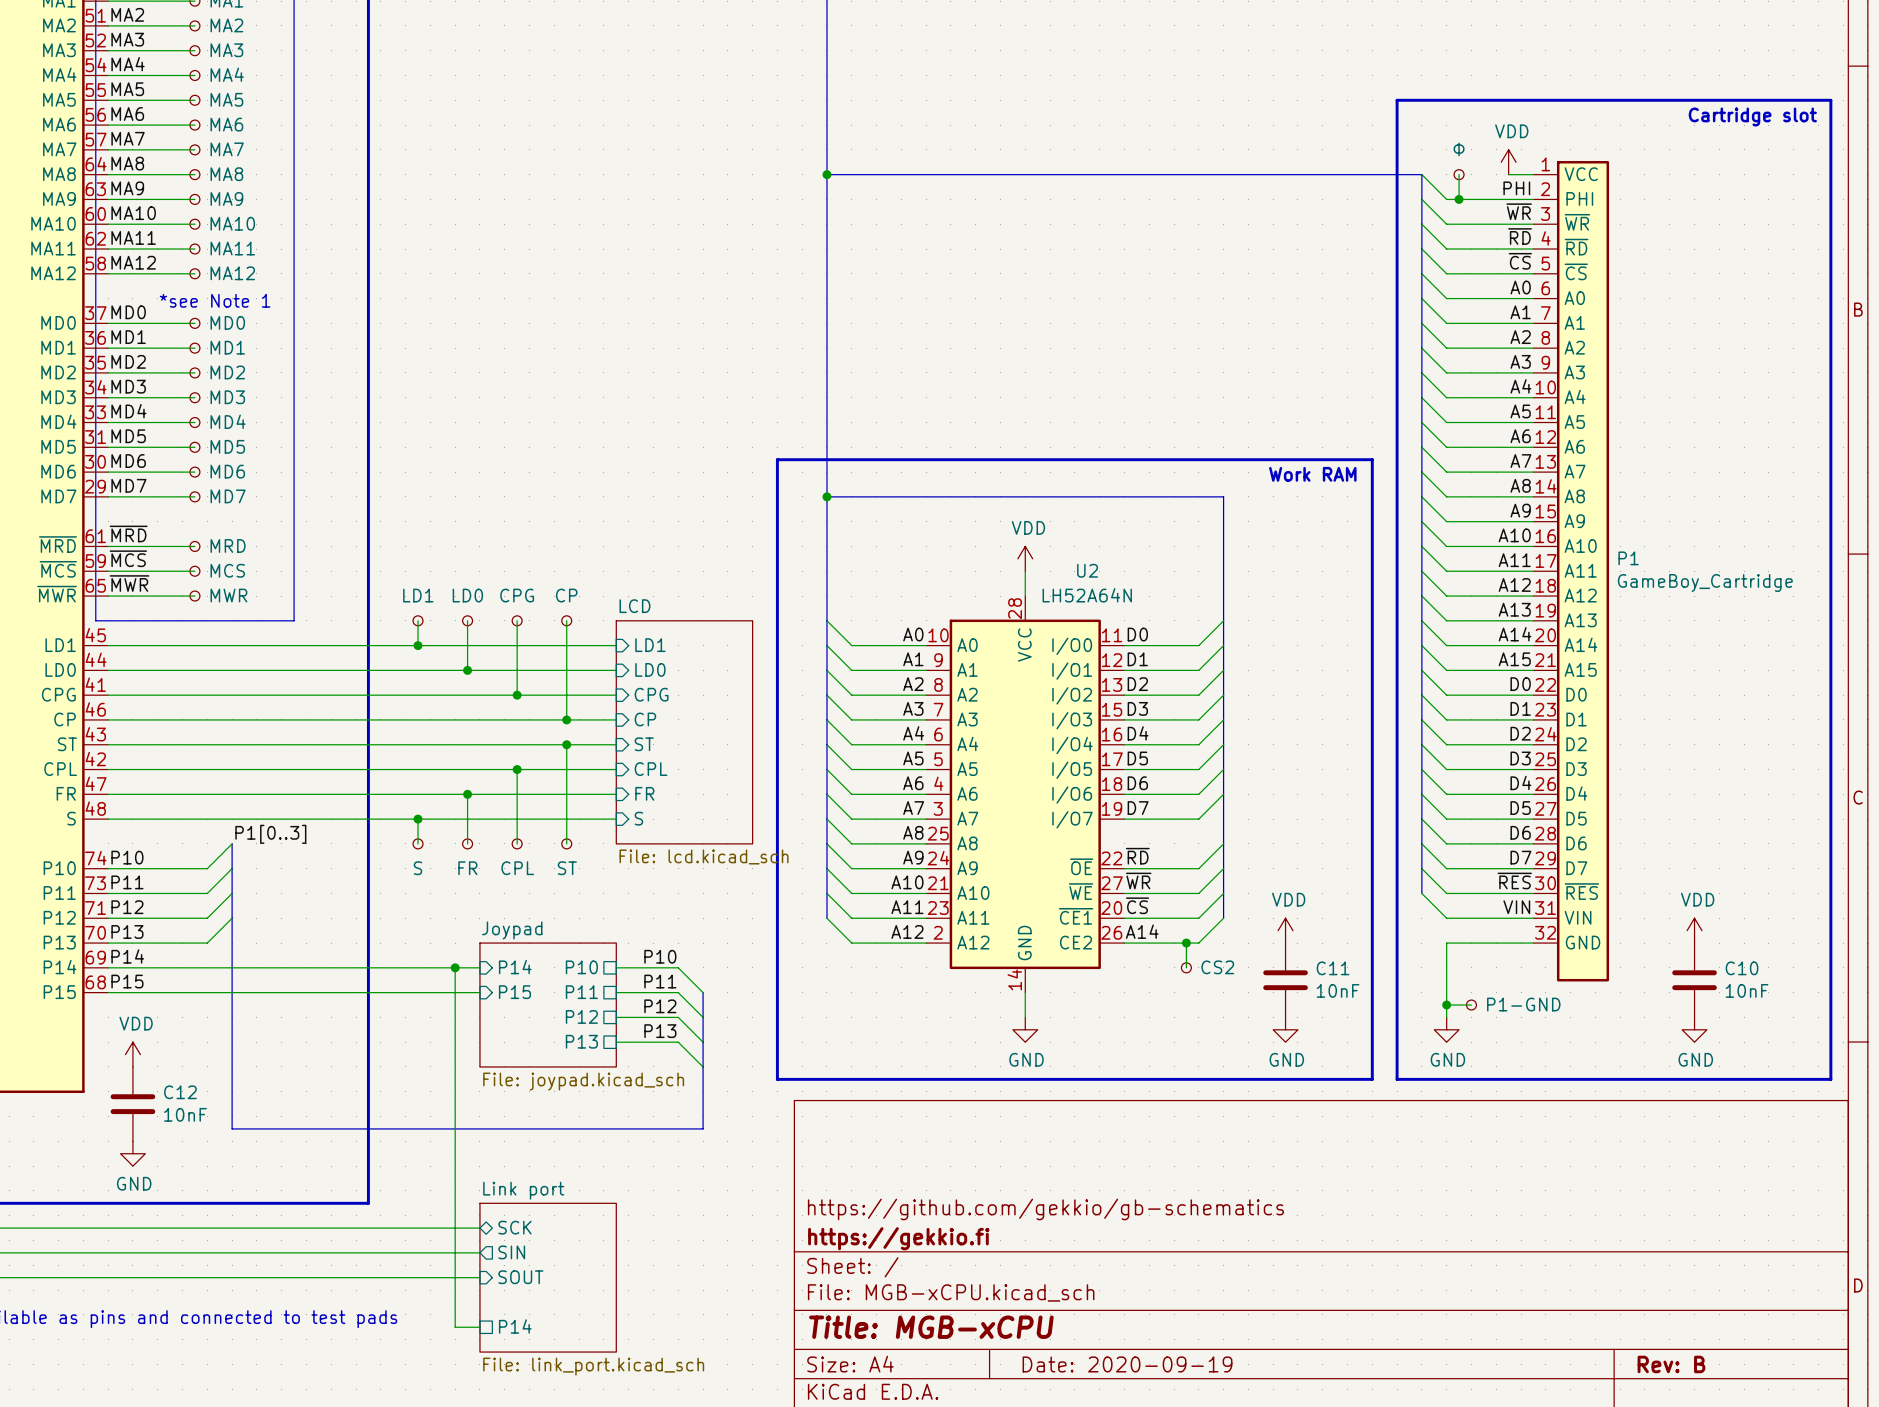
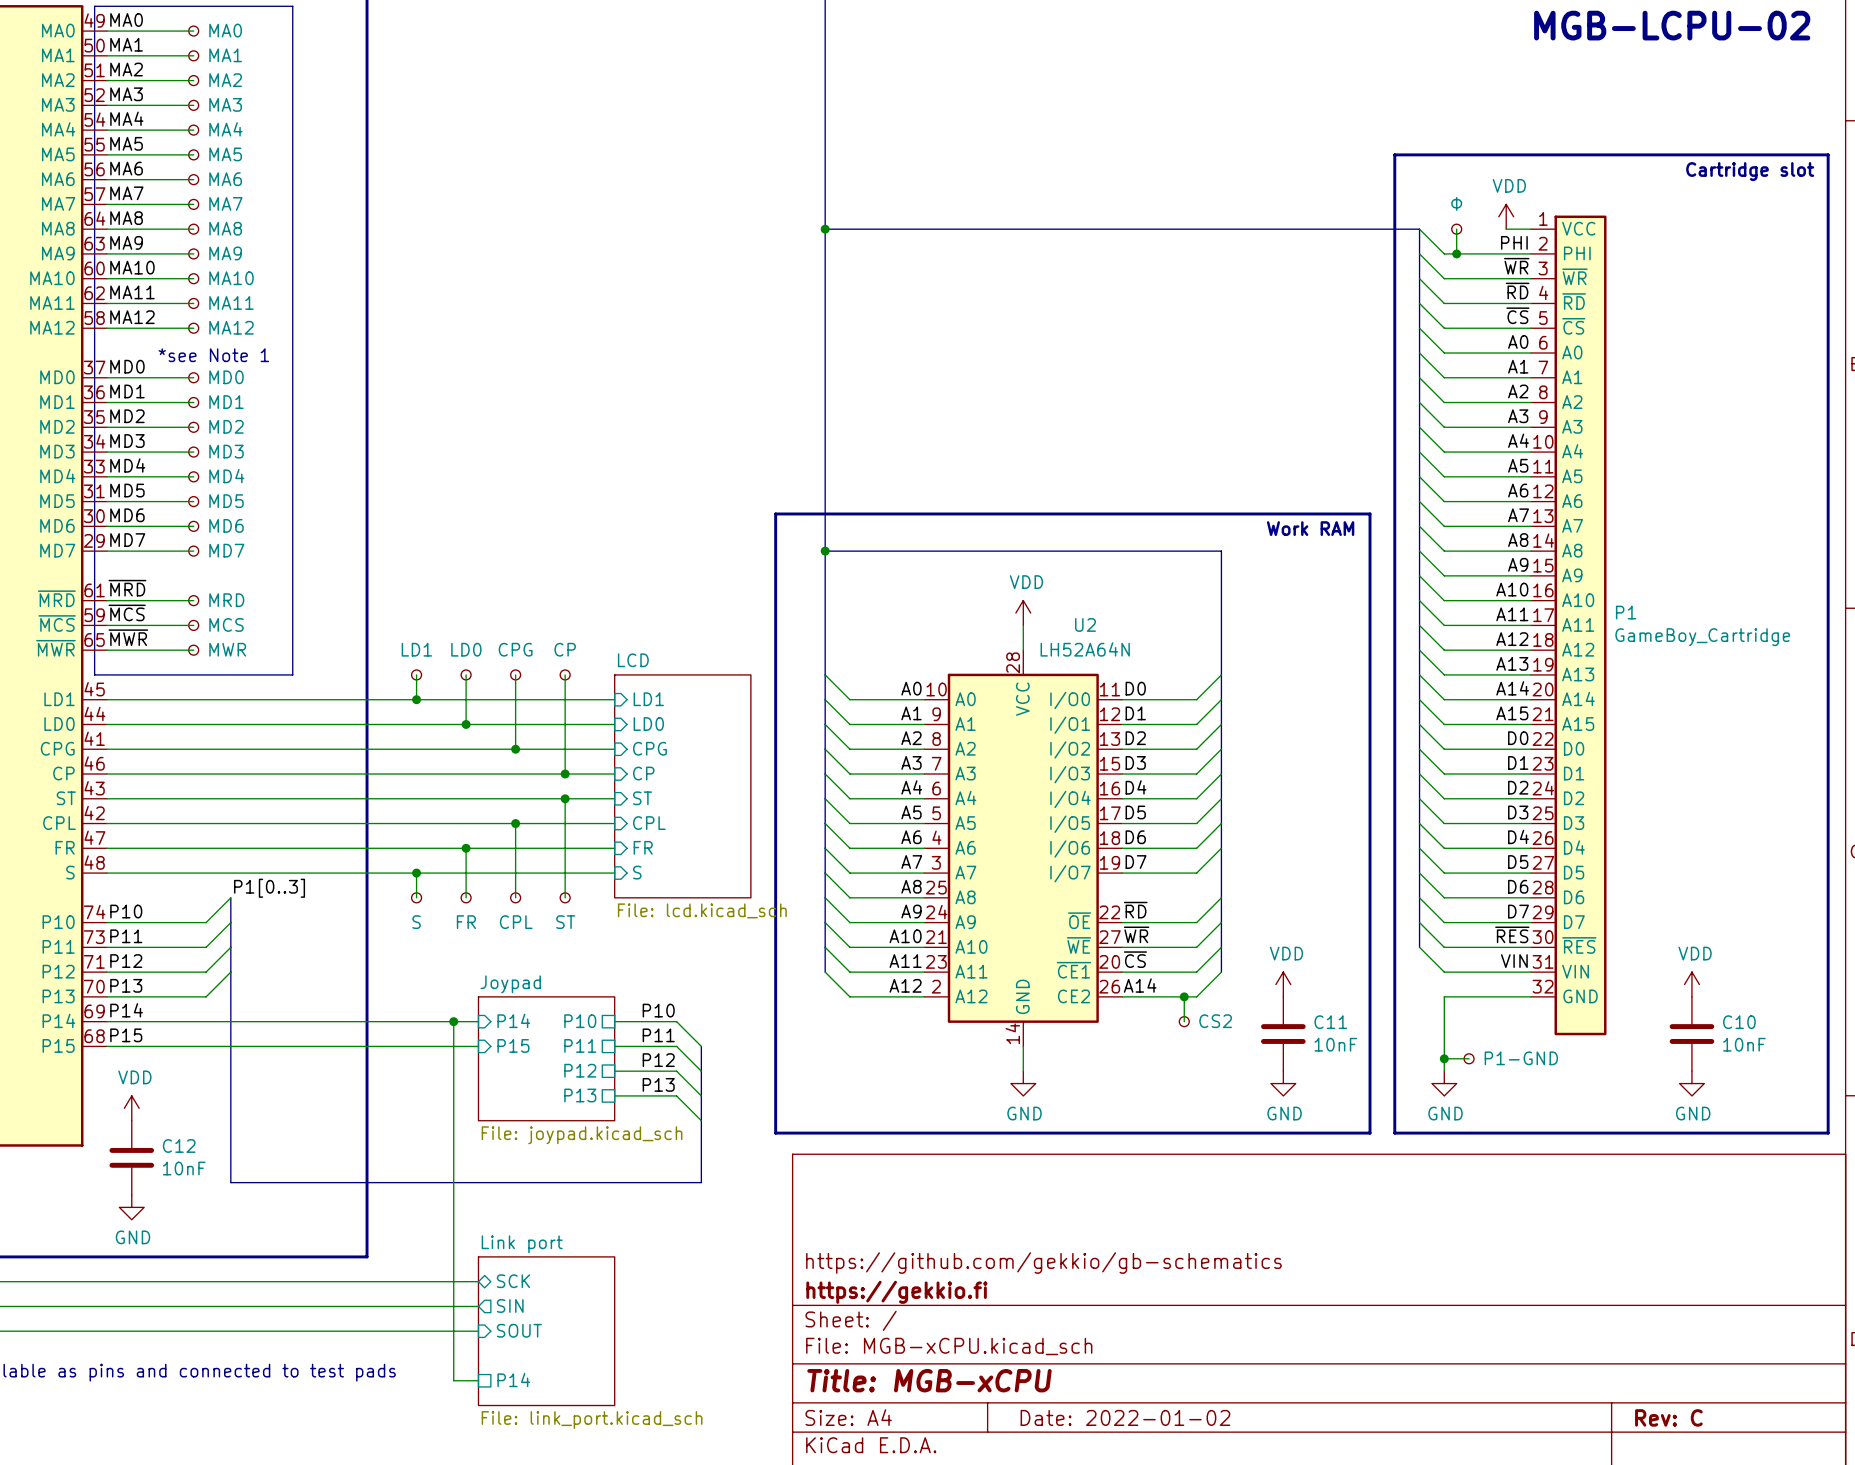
title block: Date: 2020-09-19 (1127, 1364) -> Date: 2022-01-02 (1125, 1417)
title block: Rev: B (1671, 1364) -> Rev: C (1668, 1417)

